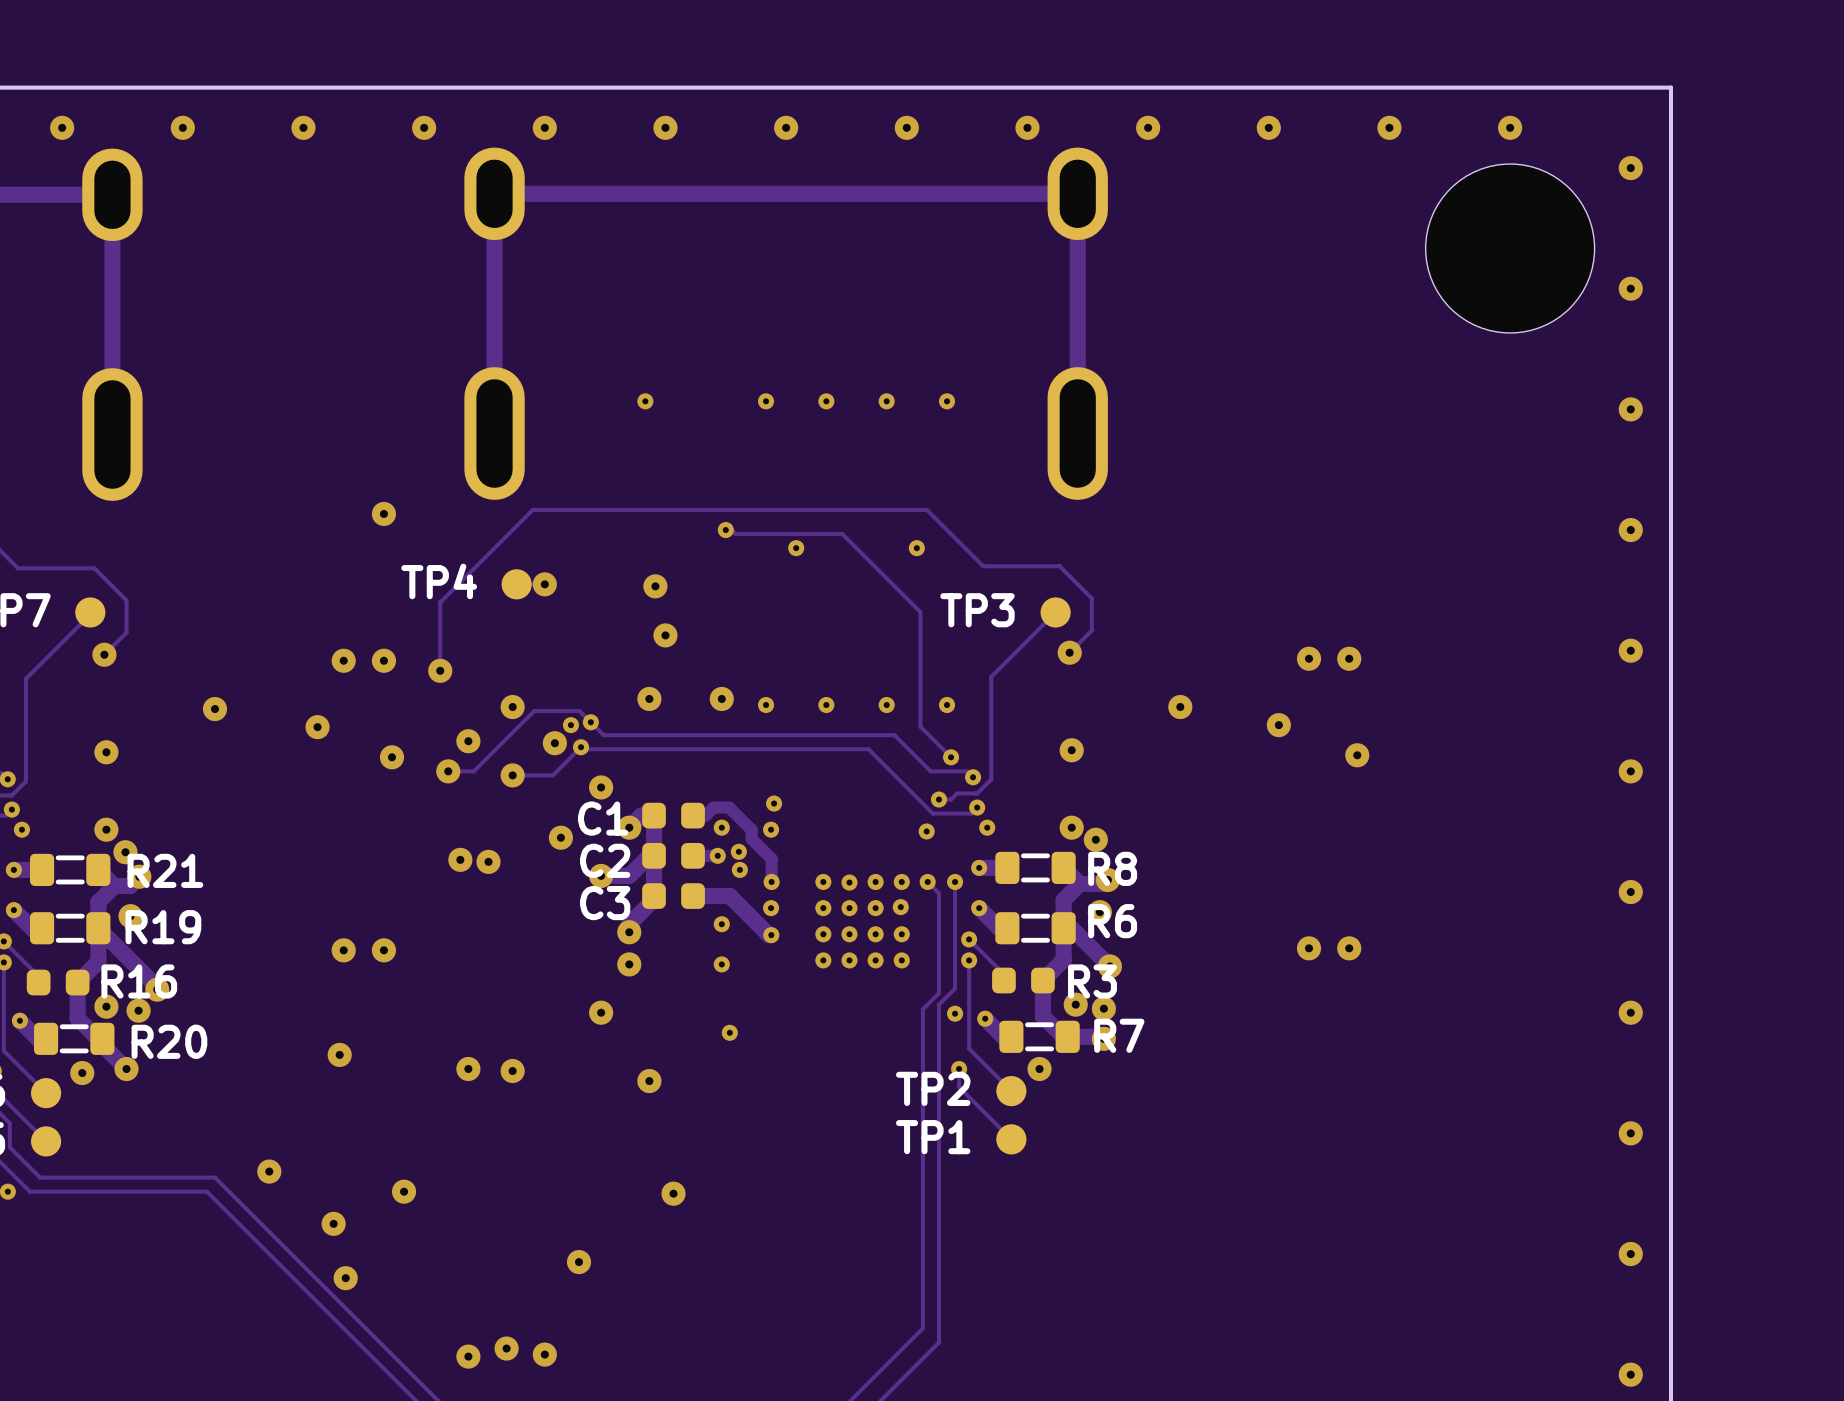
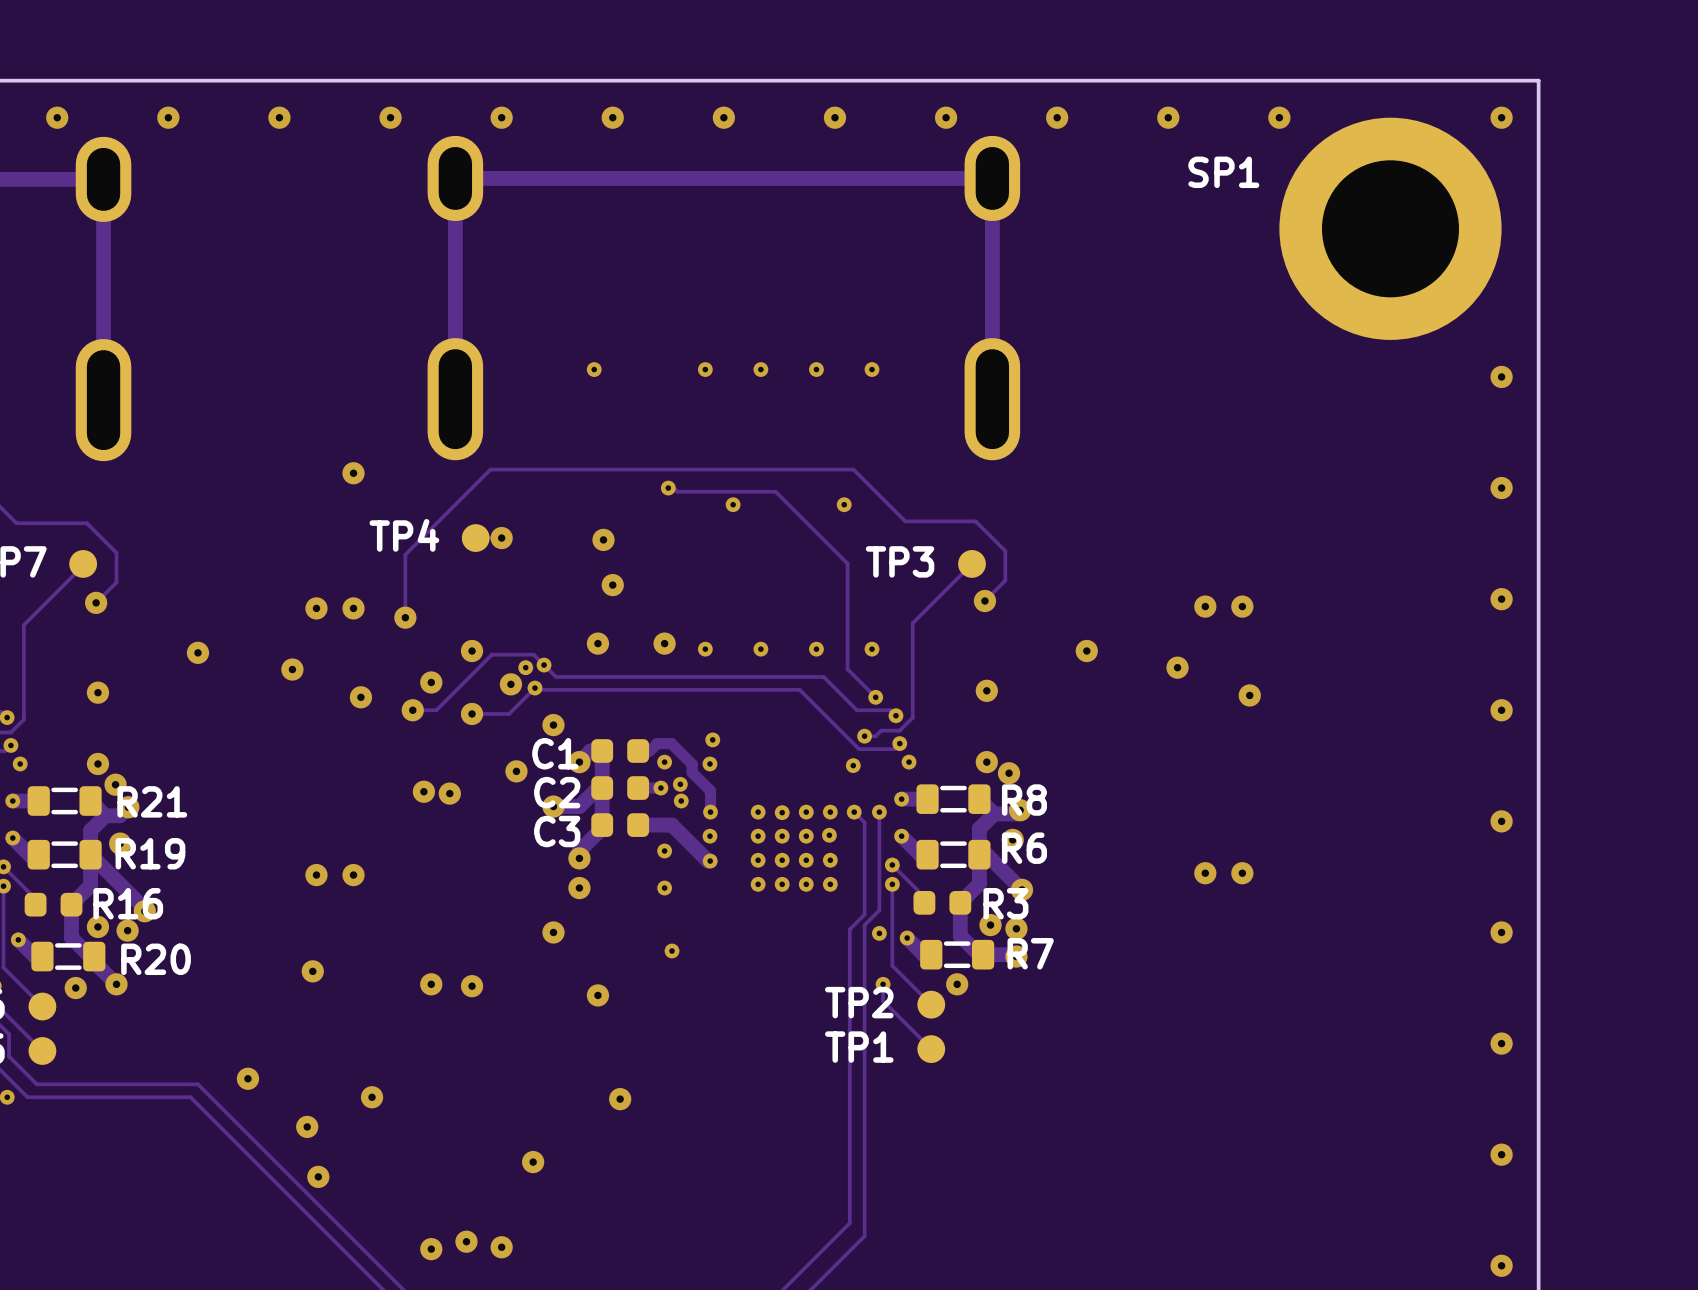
via: (1510, 127) -> none
via position: (1630, 168) -> (1501, 117)
part: (1510, 248) -> none
SP1: none -> (1390, 228)
via: (1630, 288) -> none

